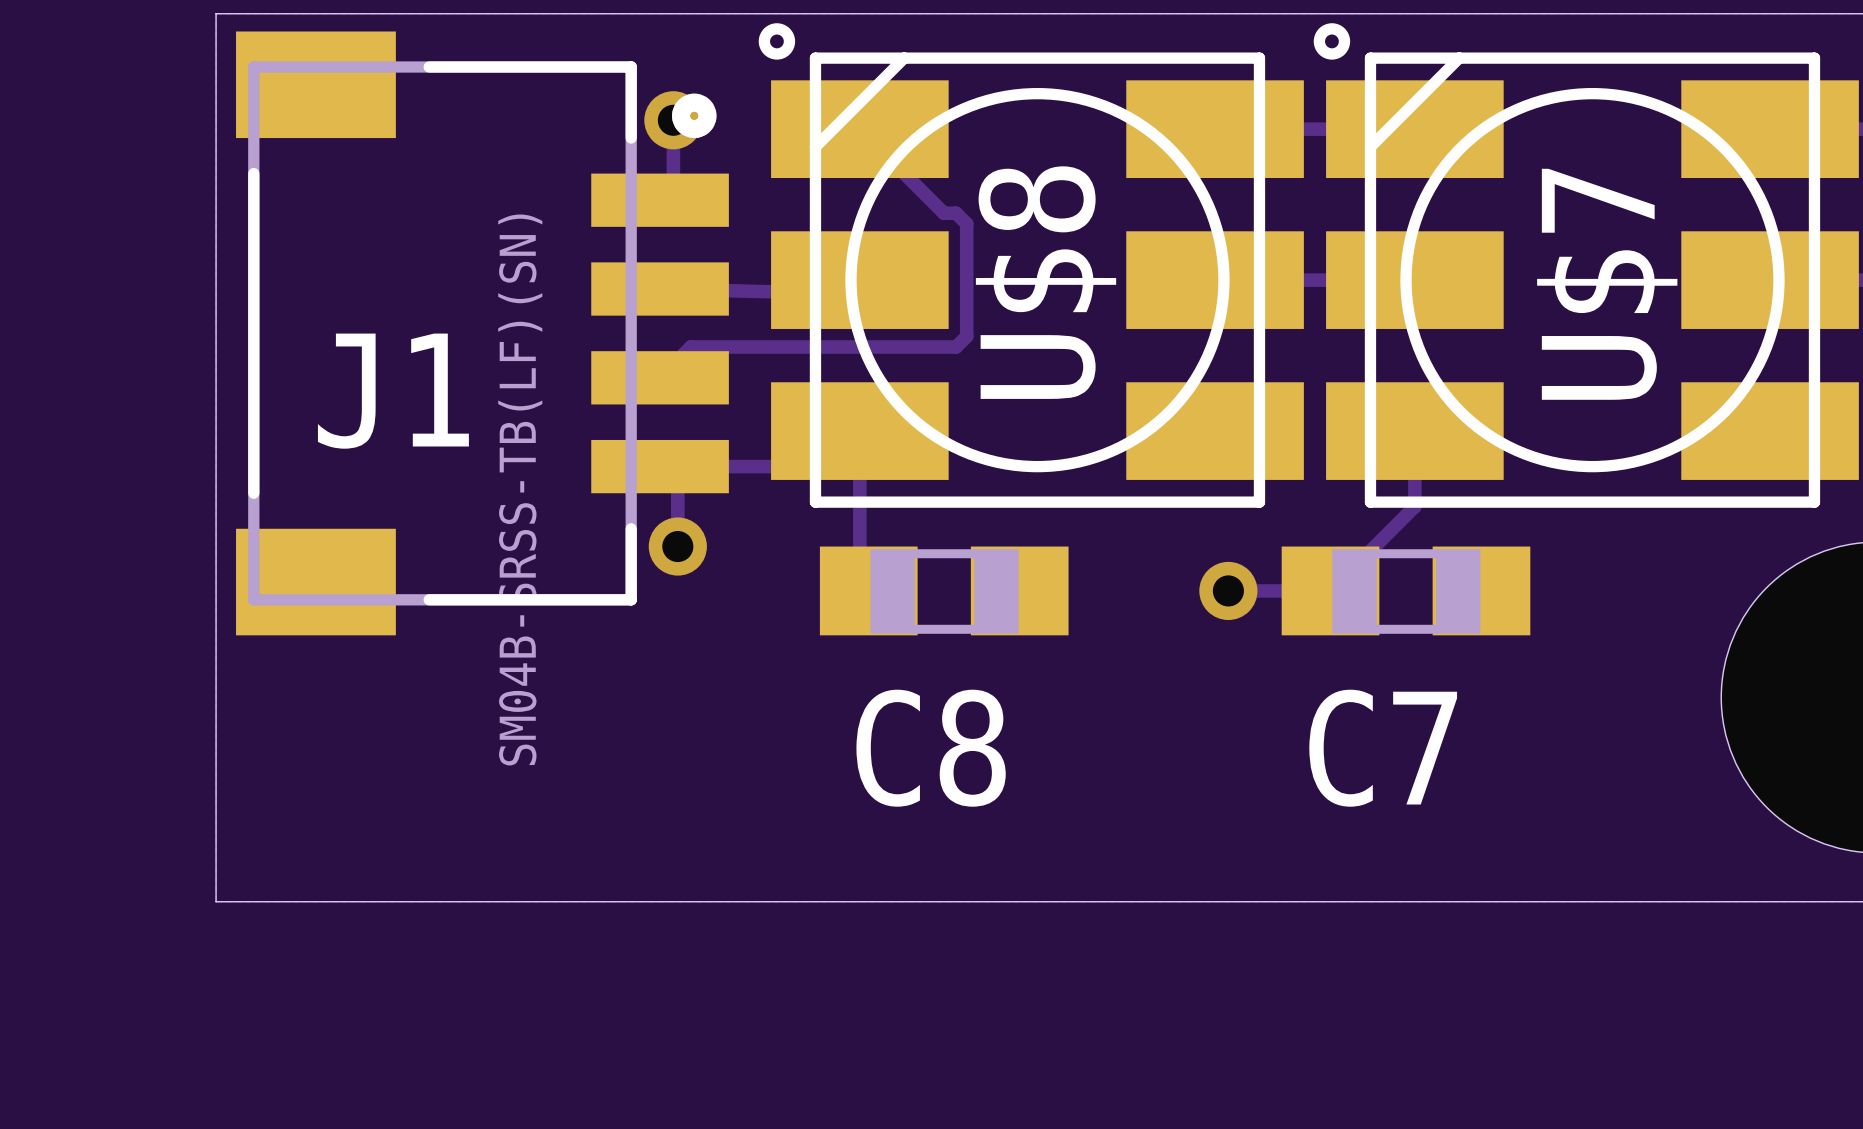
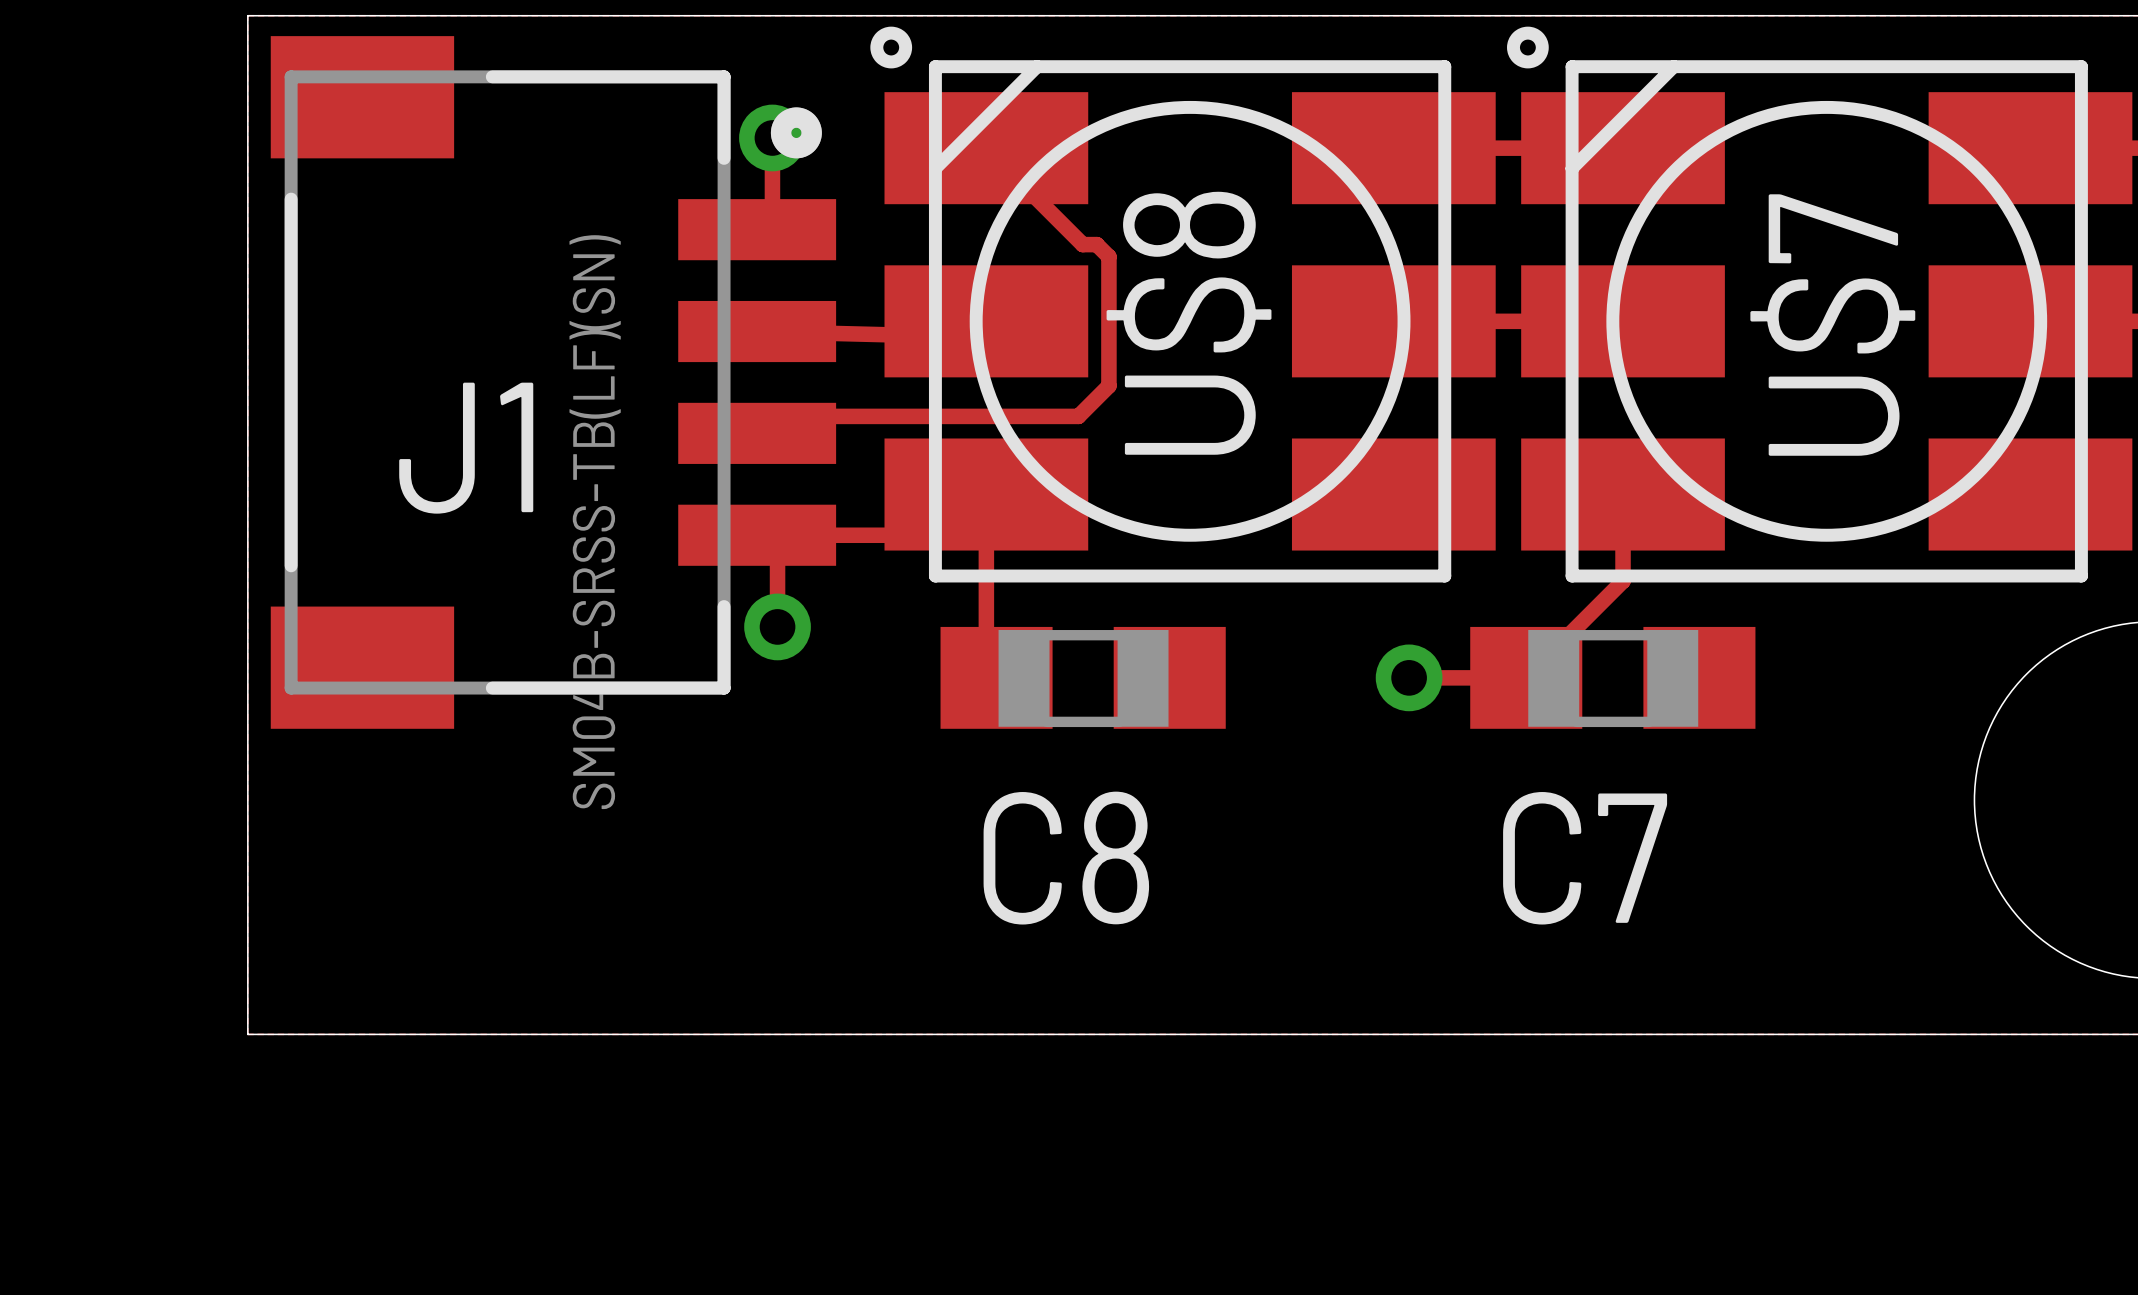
track: (956, 347) (690, 347) (674, 363) -> (1096, 398) (1078, 416) (774, 416)

